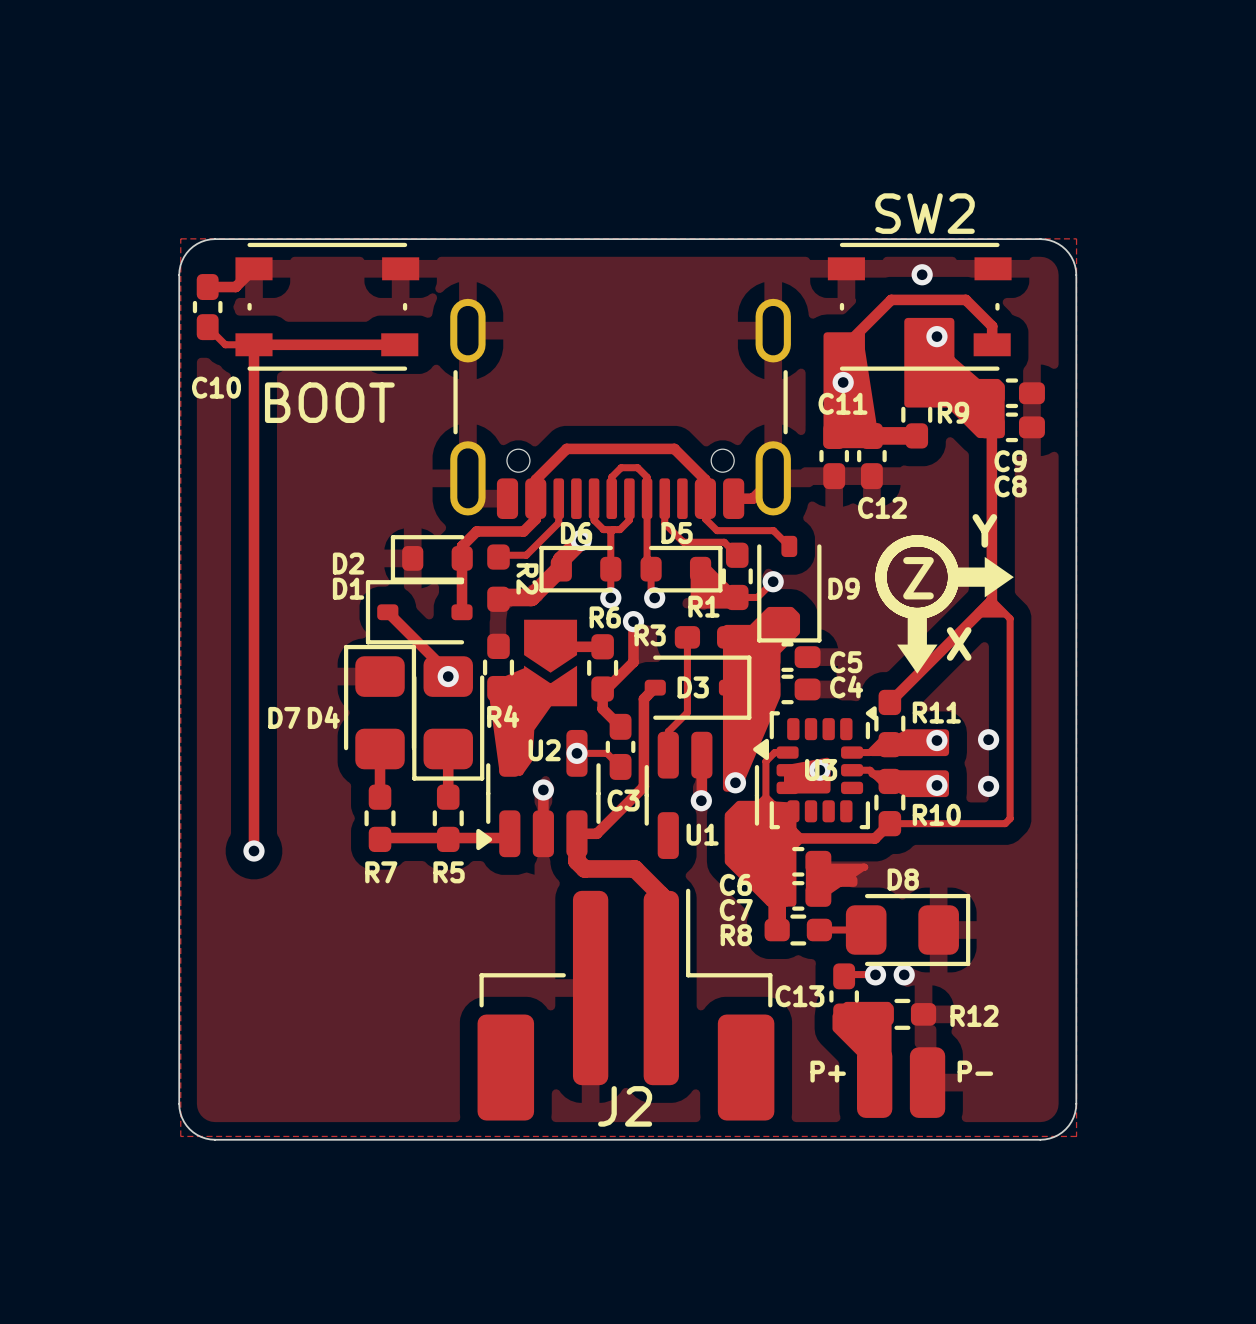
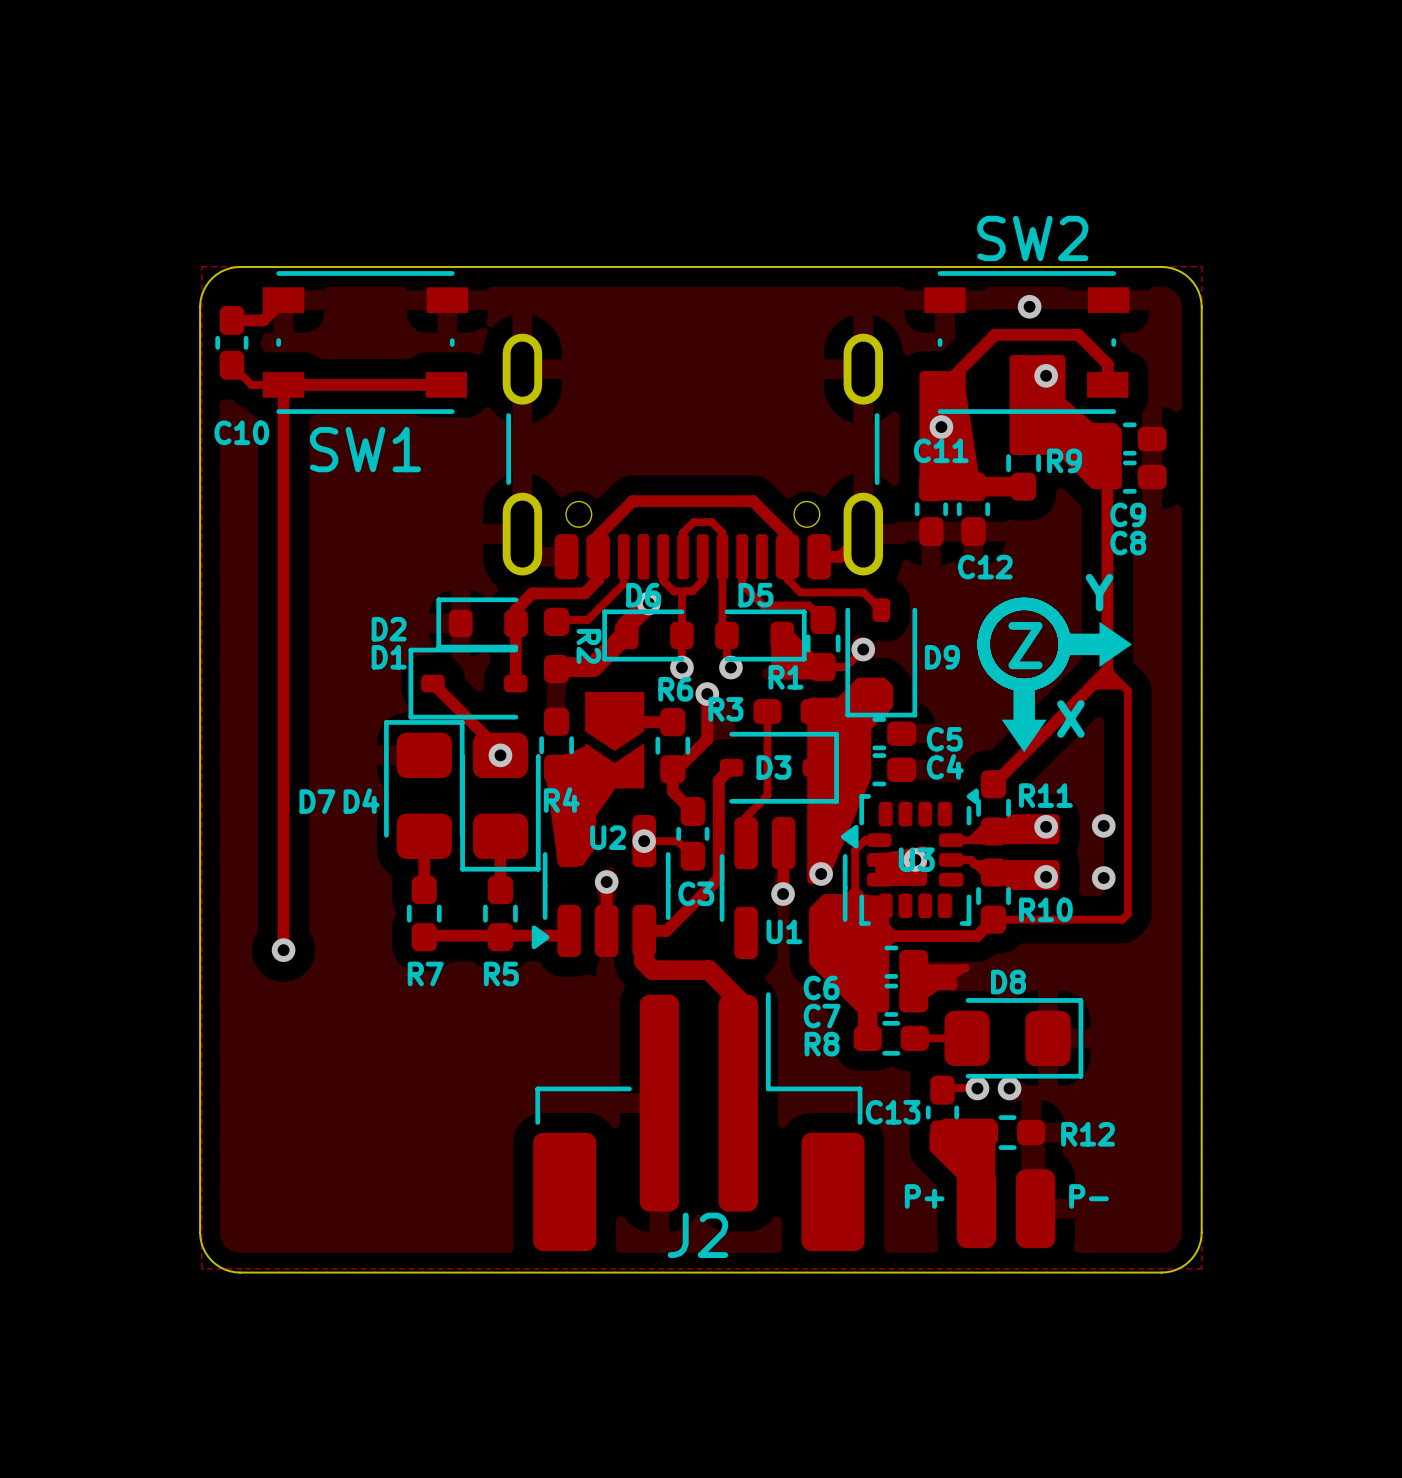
BOOT name: BOOT (329, 402) -> SW1 (365, 449)

